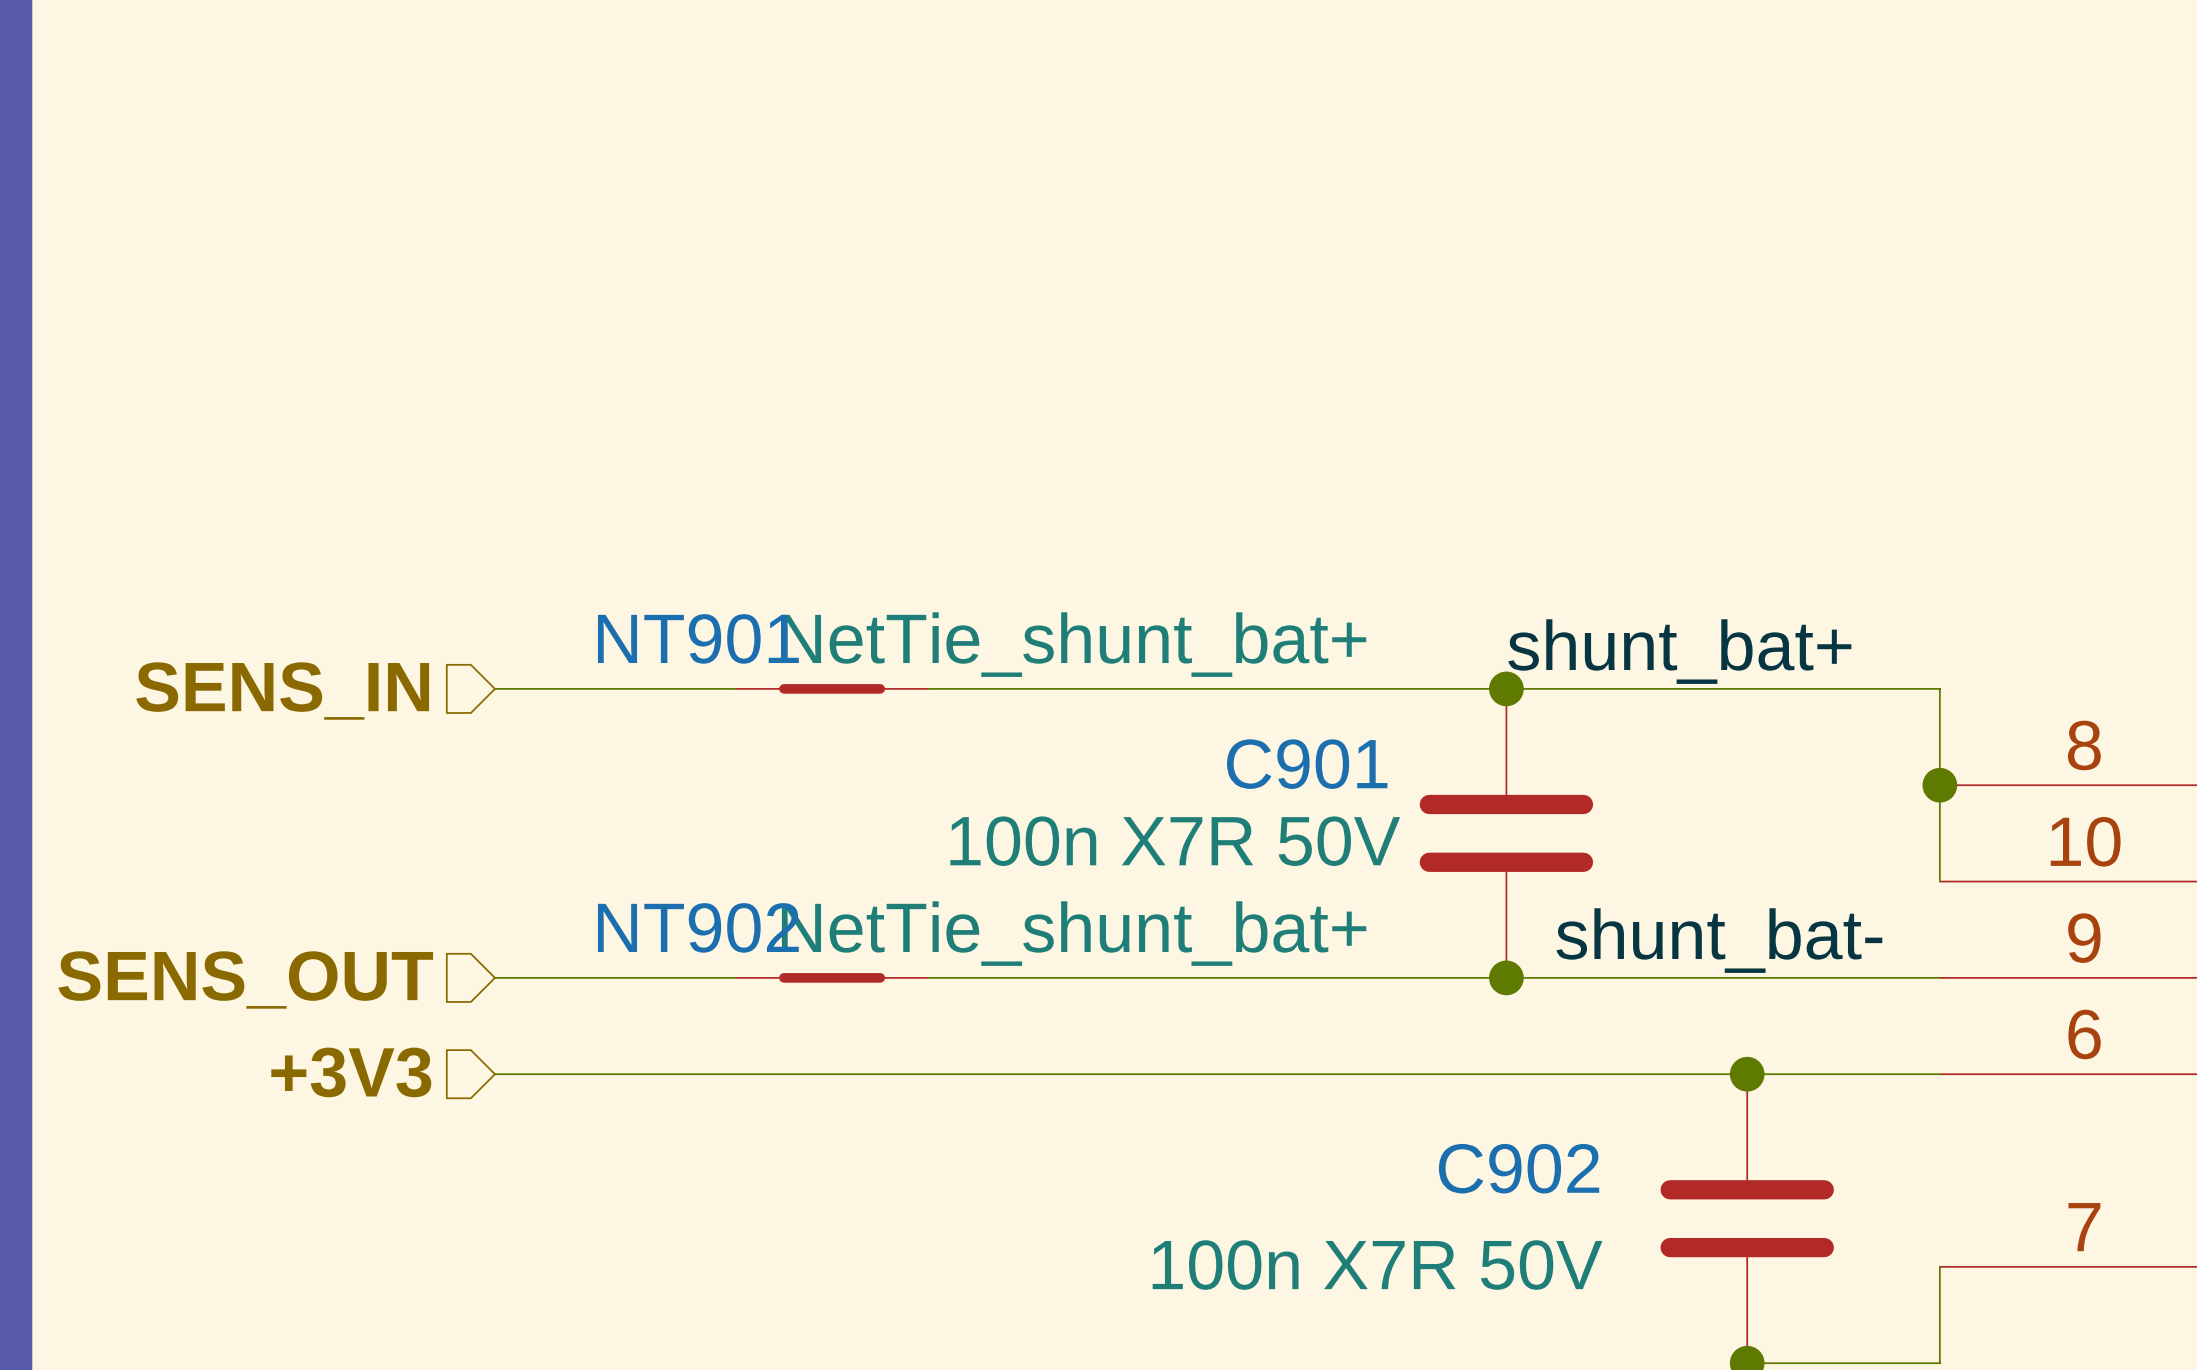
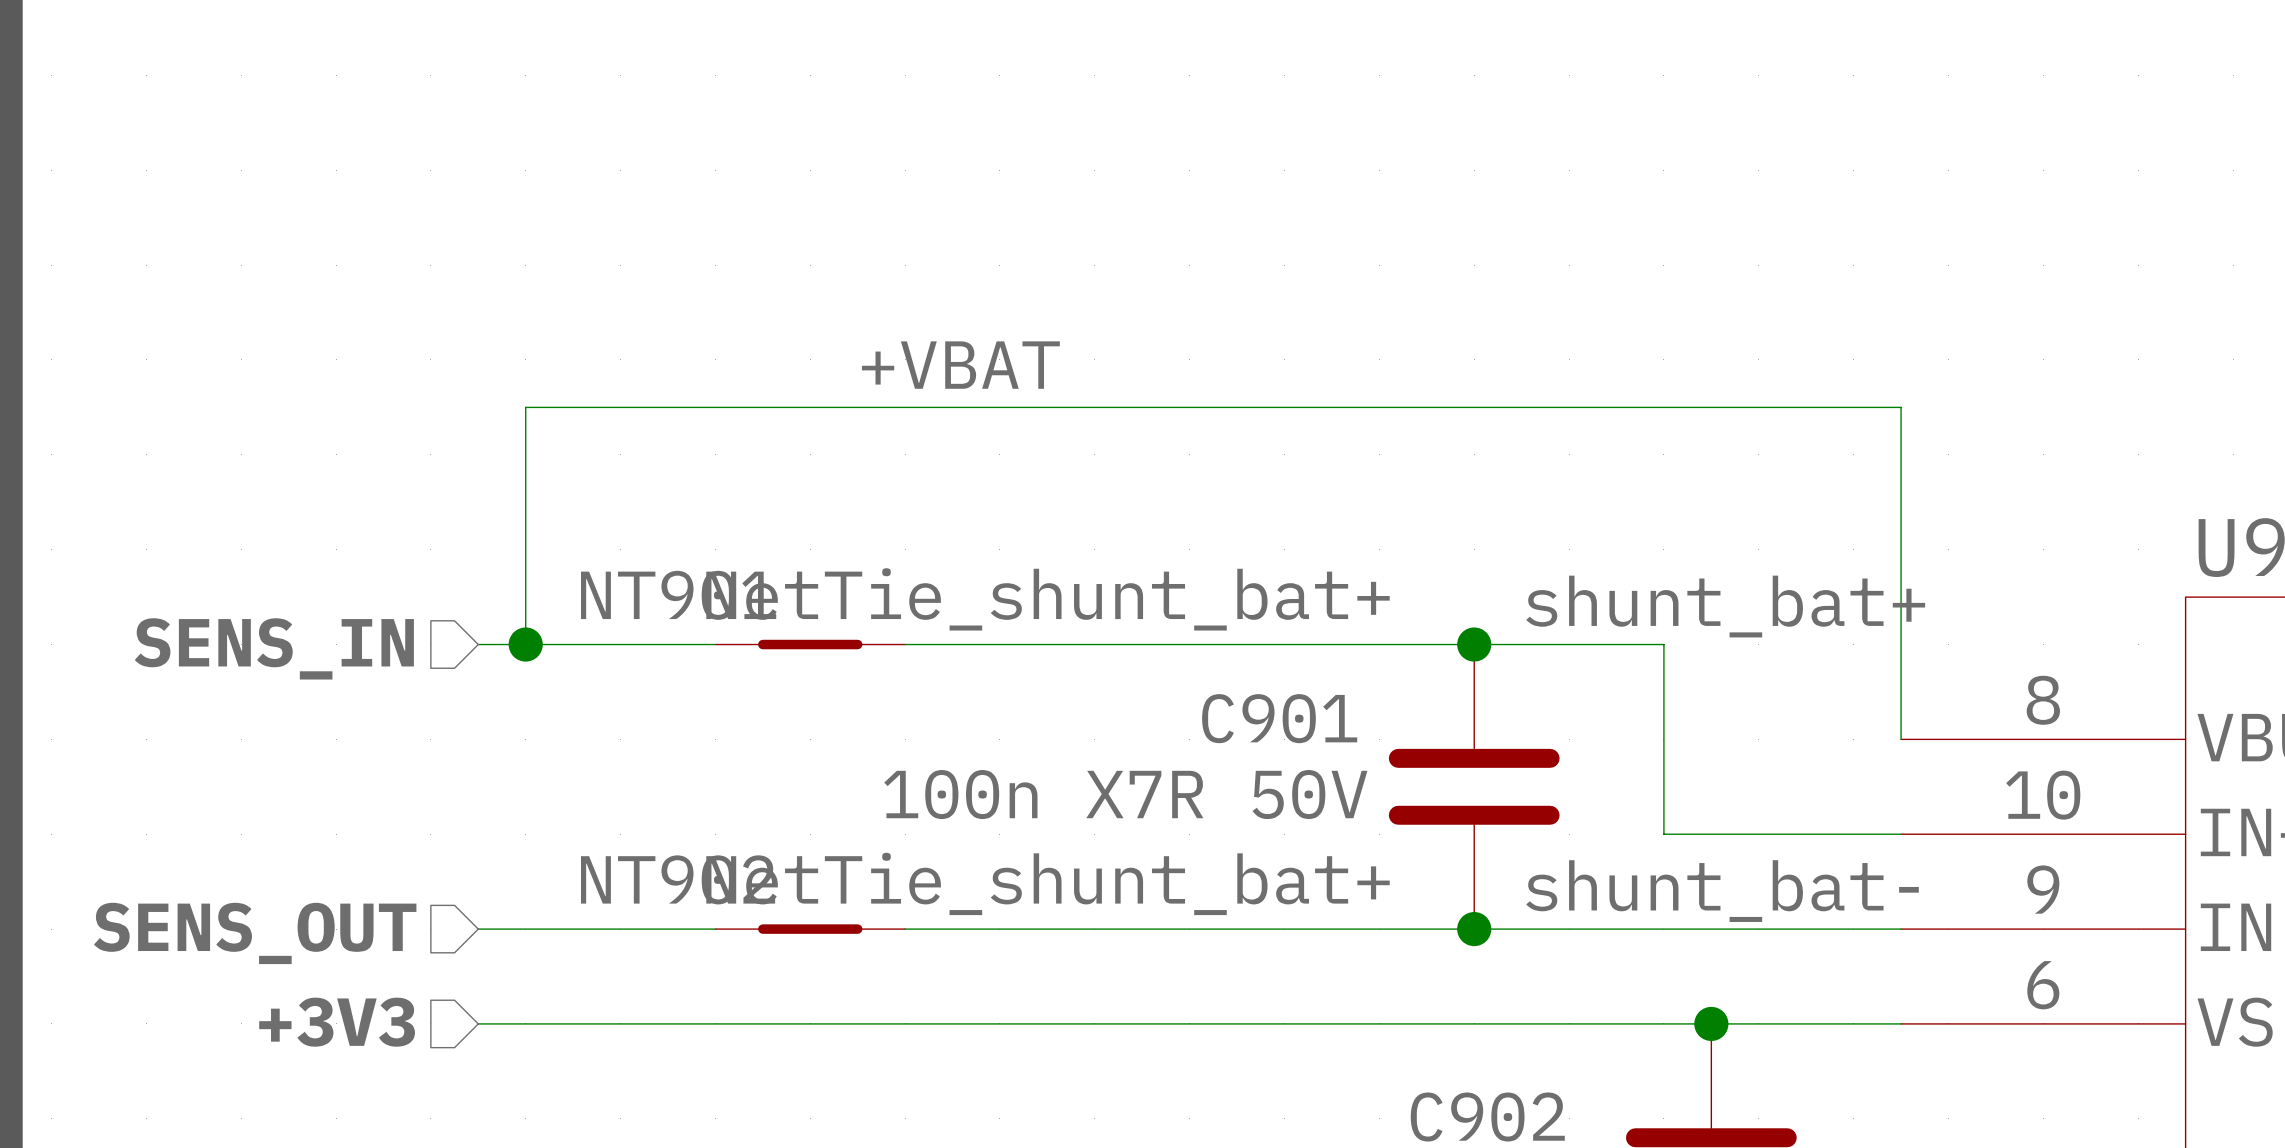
label: none -> +VBAT (960, 365)
label position: shunt_bat+ (1679, 651) -> shunt_bat+ (1725, 606)
wire: none -> (525, 644) (525, 407) (1901, 407) (1901, 644)
junction: none -> (525, 644)
wire: (1699, 688) (1939, 688) -> (1663, 644) (1663, 834) (1901, 834)
wire: (1939, 785) (1939, 881) -> none
junction: (1939, 785) -> none

